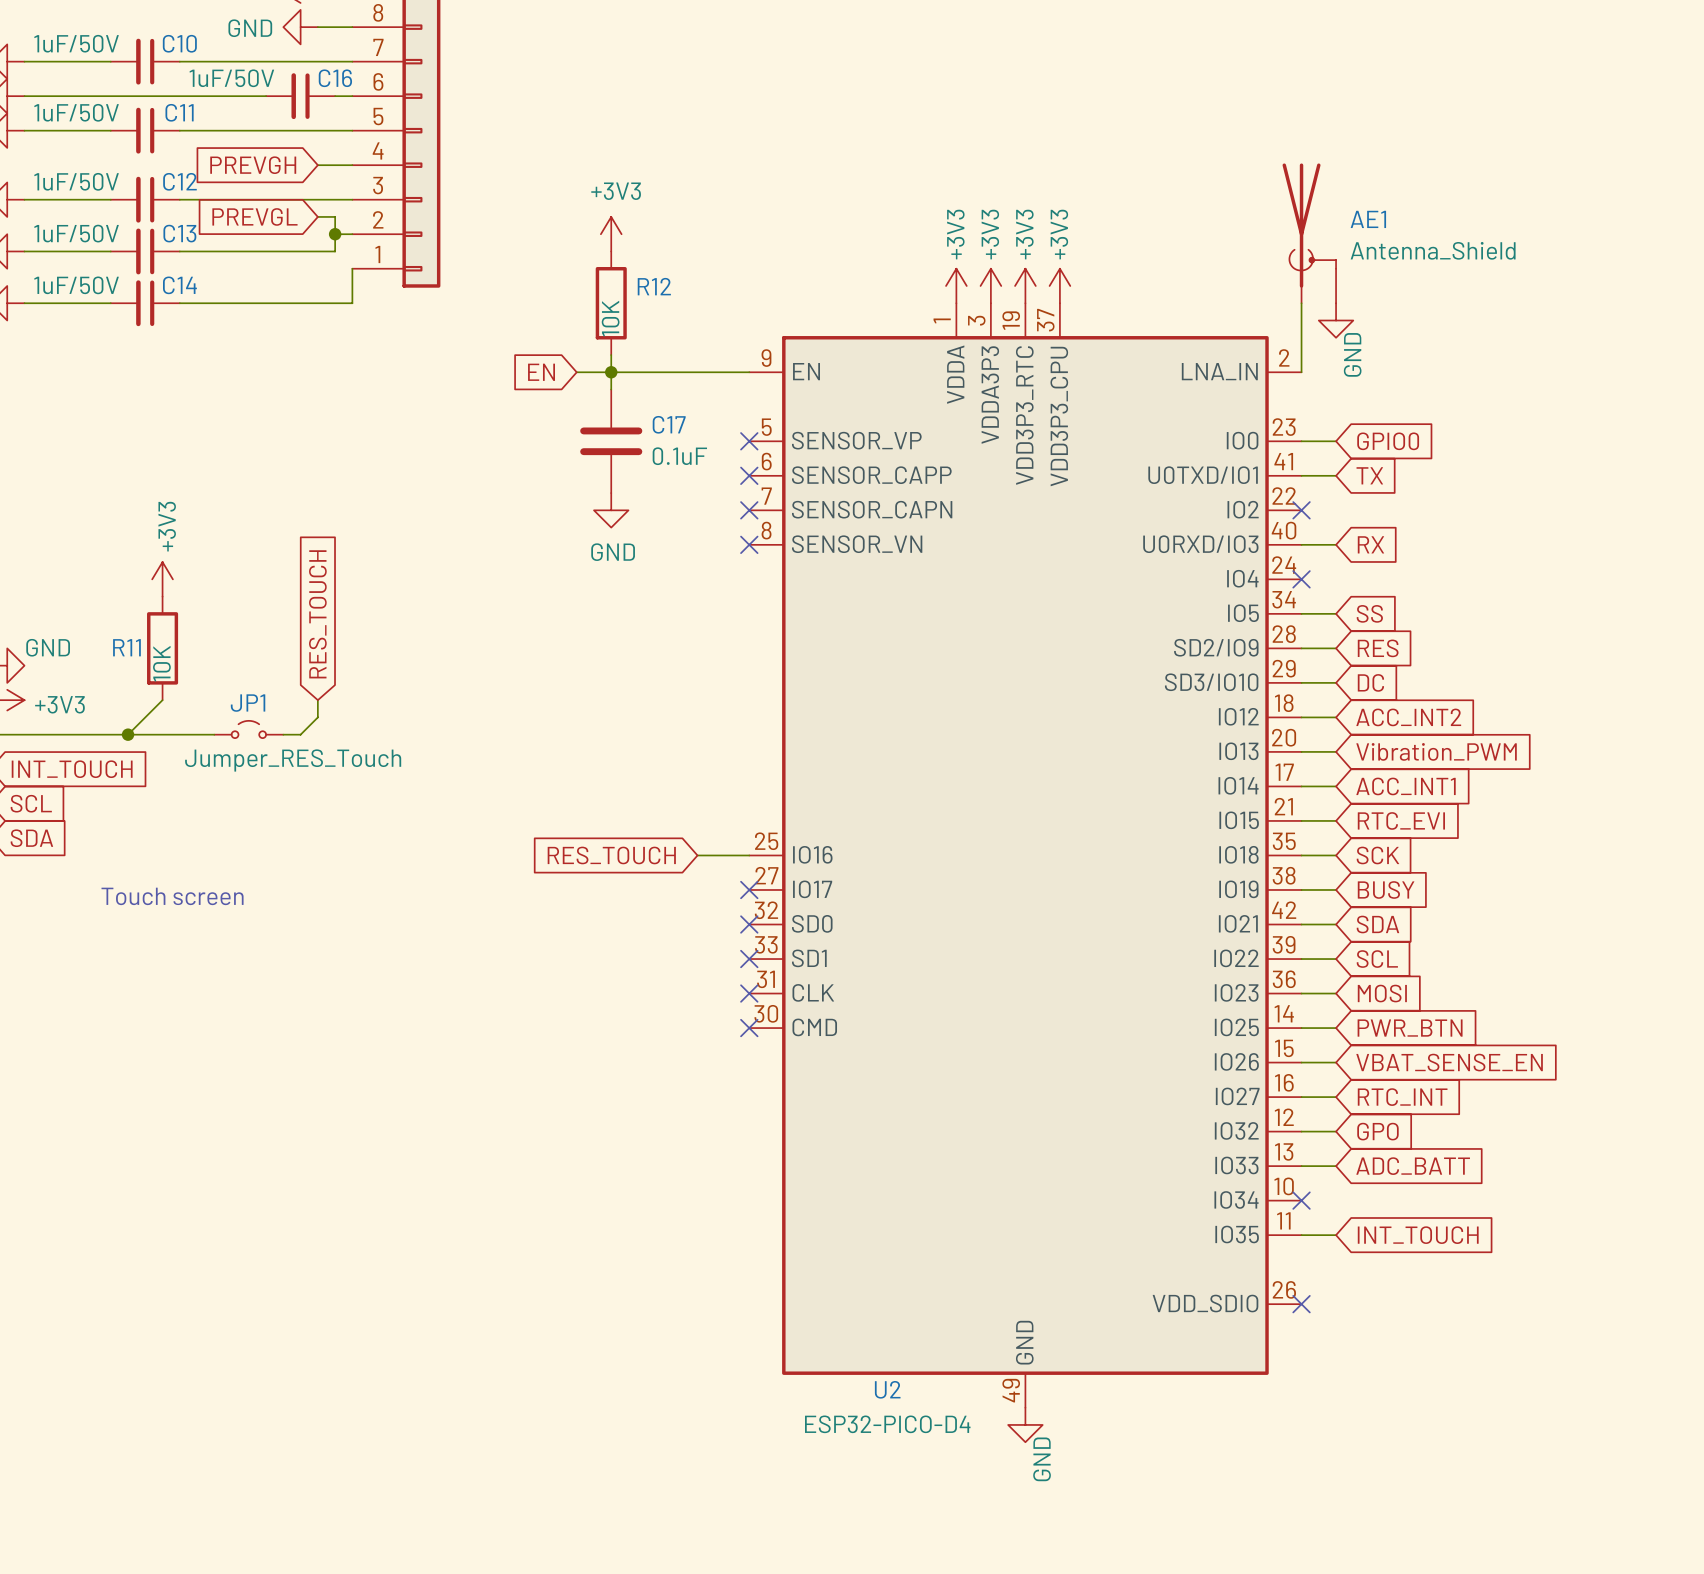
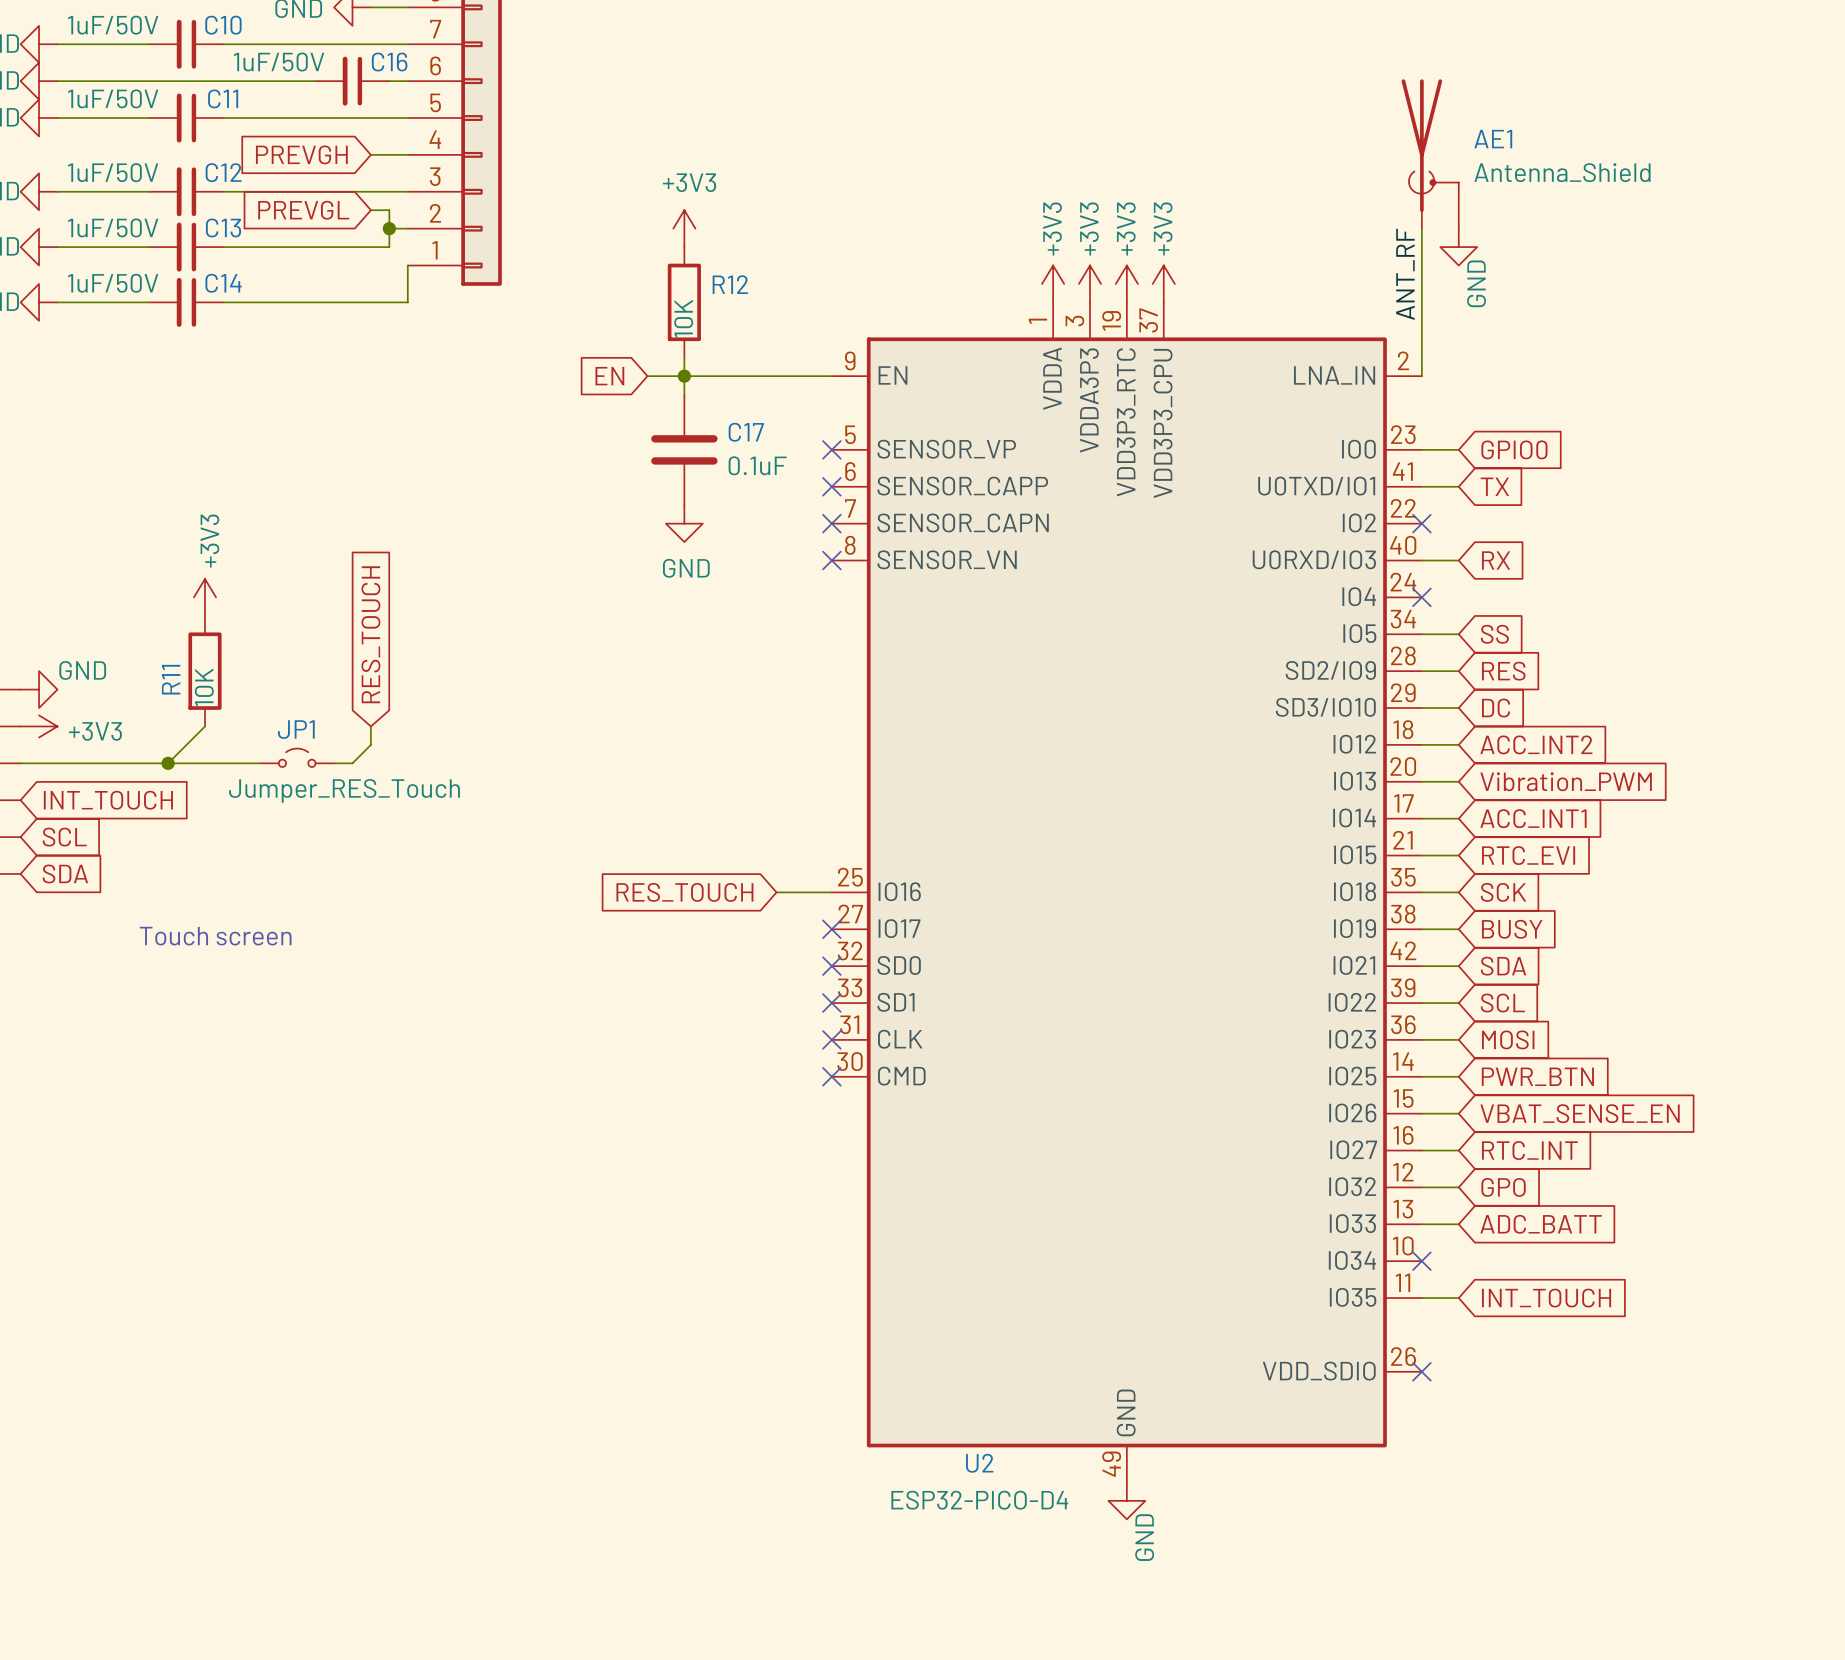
AE1 position: (1309, 233) -> (1430, 153)
label: none -> ANT_RF (1405, 274)
power symbol position: GND (1336, 320) -> GND (1458, 247)
R11 name rotation: 0° (126, 647) -> 90° counterclockwise (171, 679)

